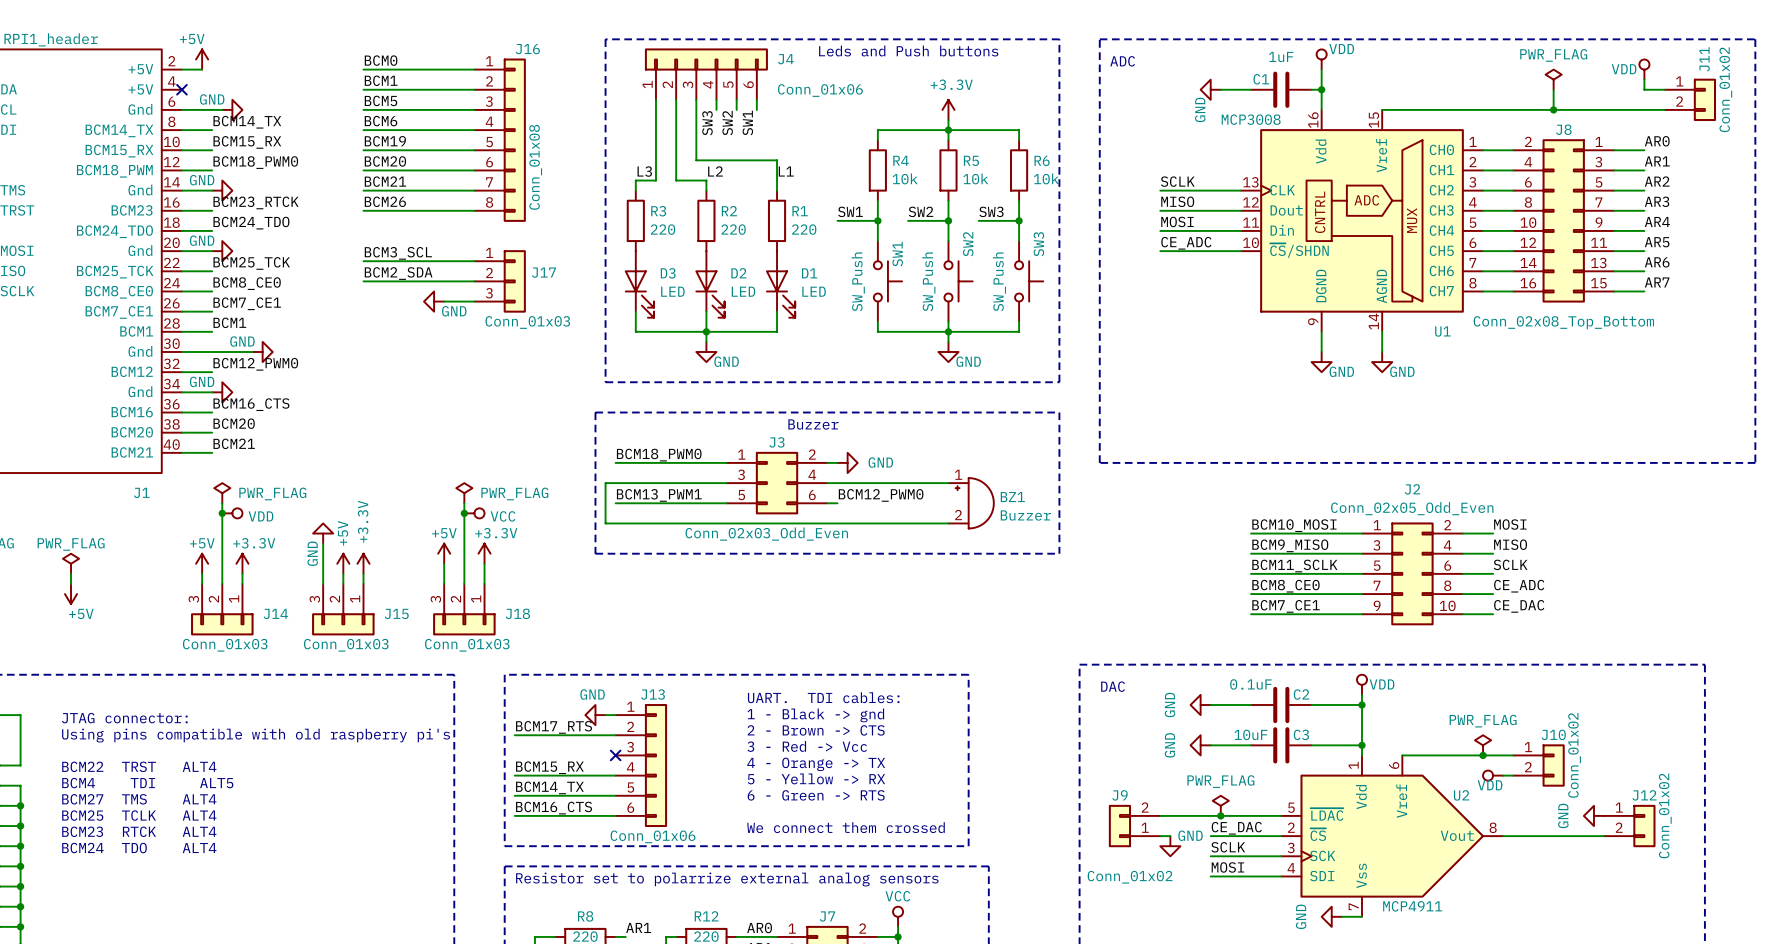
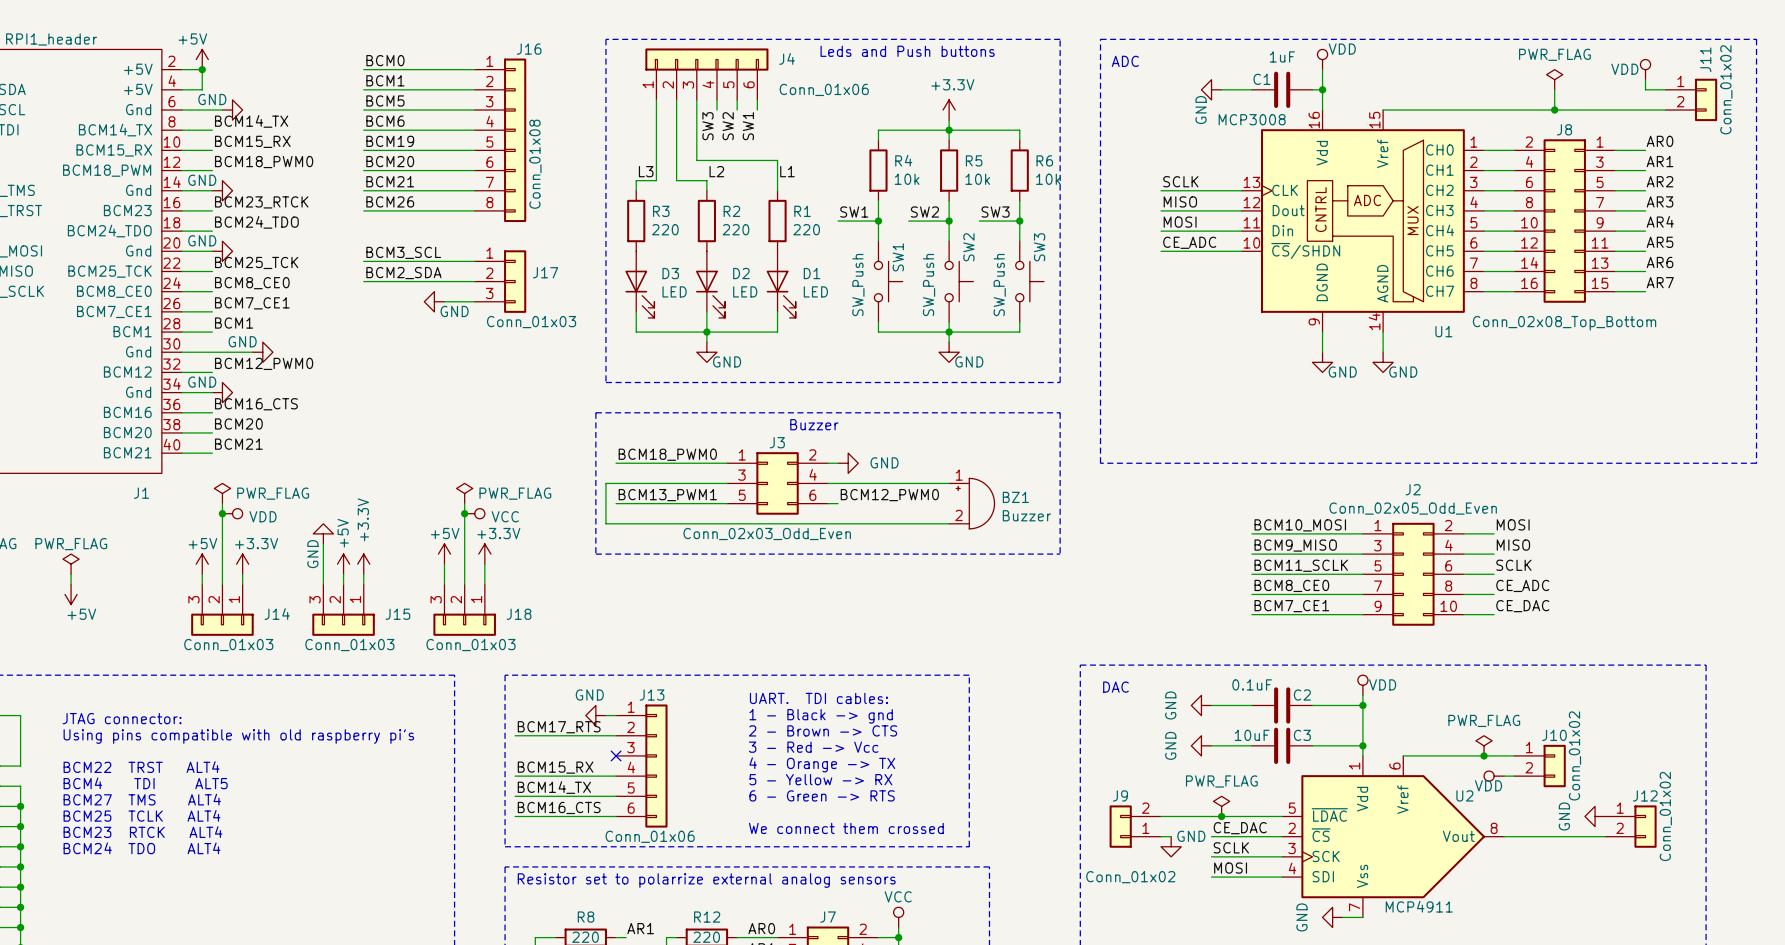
wire: none -> (202, 69) (202, 89) (182, 89)
junction: none -> (202, 69)
no-connect mark: (181, 89) -> none

